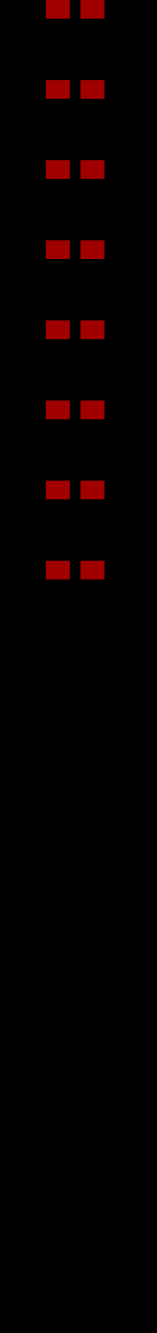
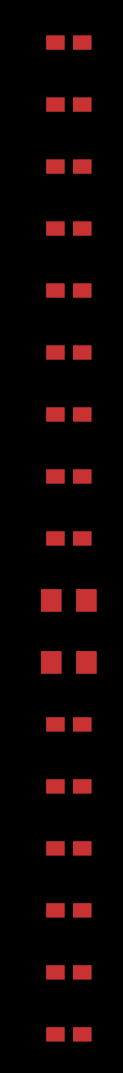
part: none -> (68, 538)
part: none -> (68, 600)
part: none -> (68, 662)
part: none -> (68, 724)
part: none -> (68, 786)
part: none -> (68, 848)
part: none -> (68, 910)
part: none -> (68, 972)
part: none -> (68, 1034)

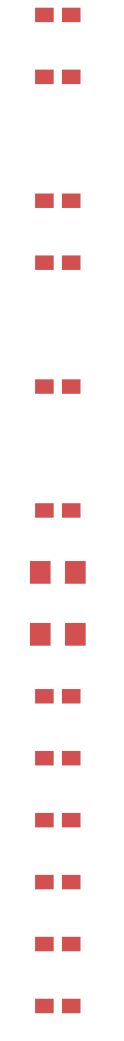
part: (68, 166) -> none
part: (68, 352) -> none
part: (68, 476) -> none

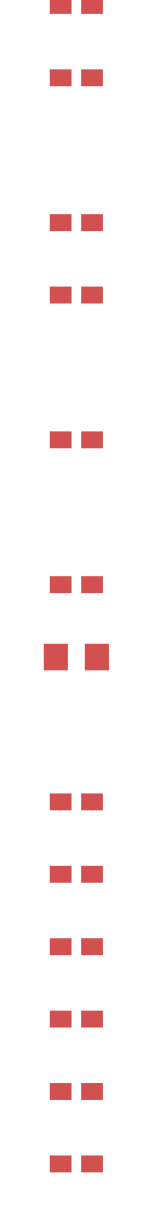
part: (57, 634) -> none

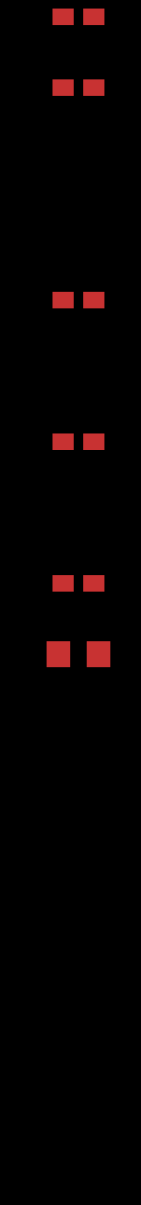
part: (76, 222) -> none
part: (76, 801) -> none
part: (76, 874) -> none
part: (76, 946) -> none
part: (76, 1019) -> none
part: (76, 1091) -> none
part: (76, 1163) -> none

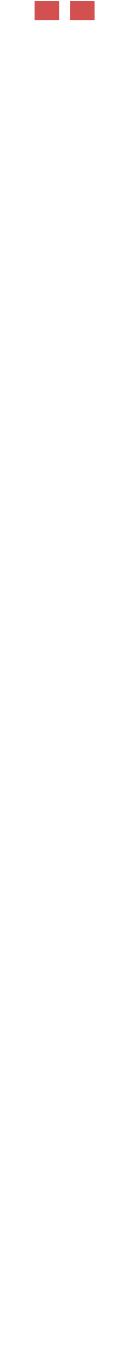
part: (78, 87) -> none
part: (78, 300) -> none
part: (78, 441) -> none
part: (78, 583) -> none
part: (78, 654) -> none

